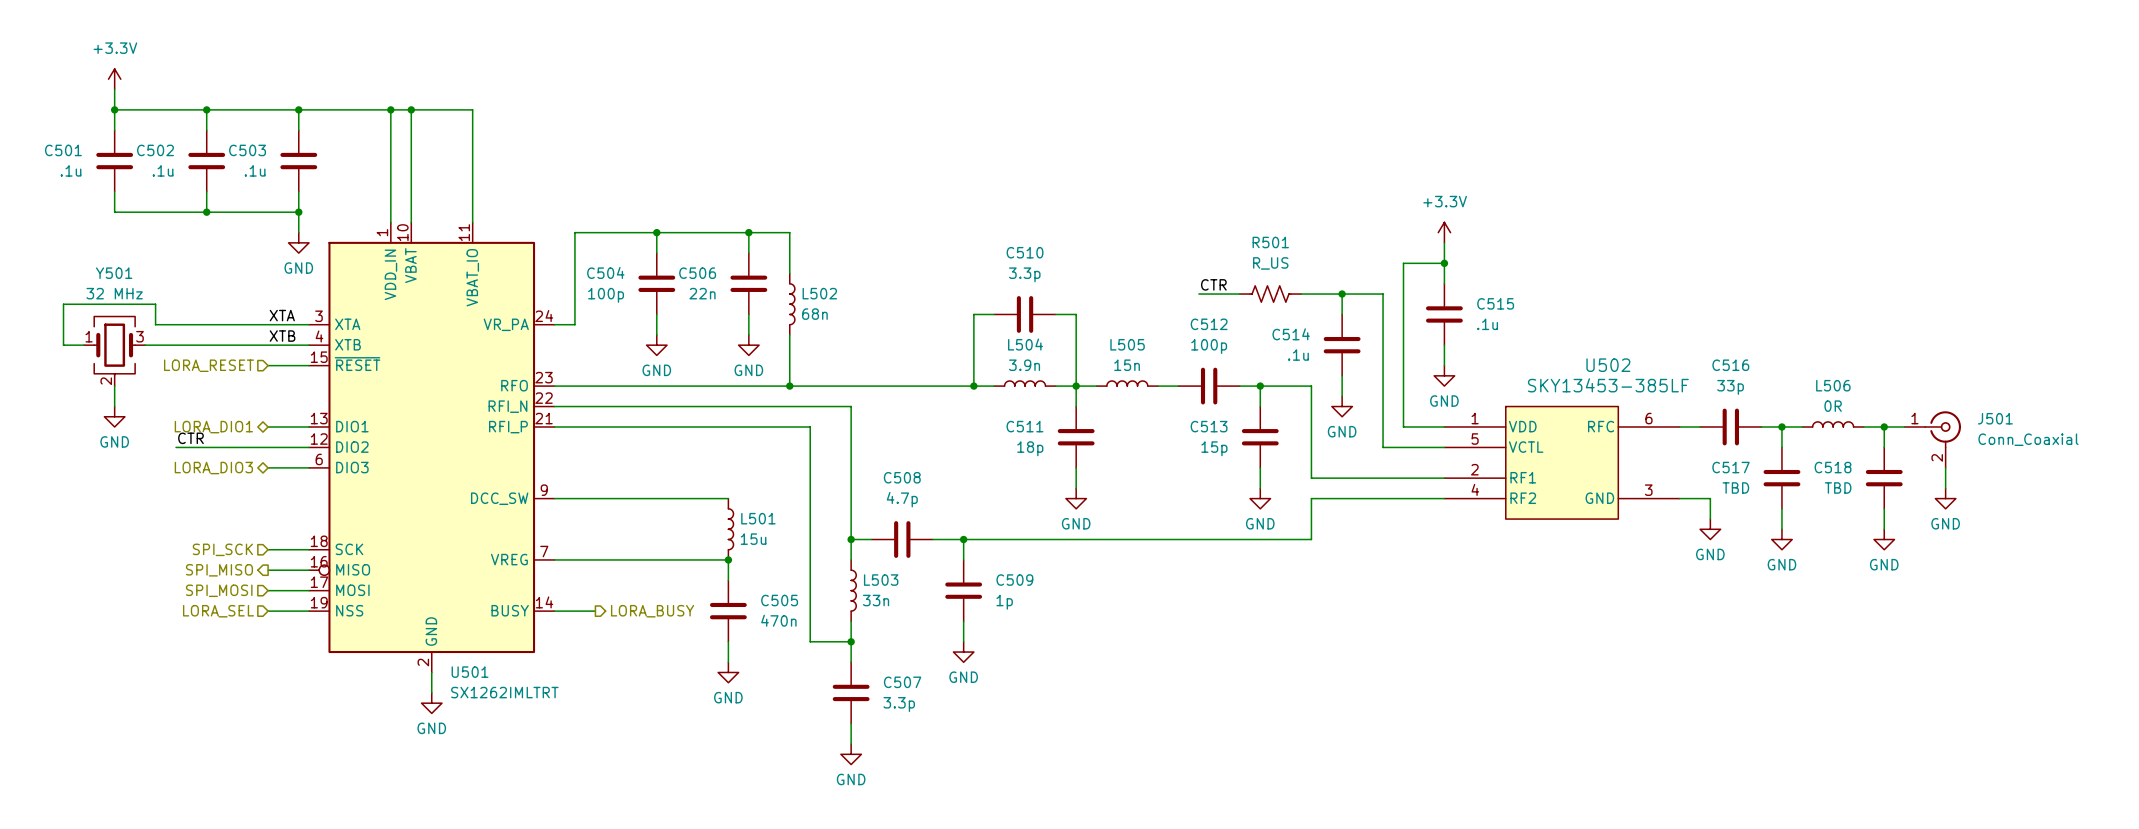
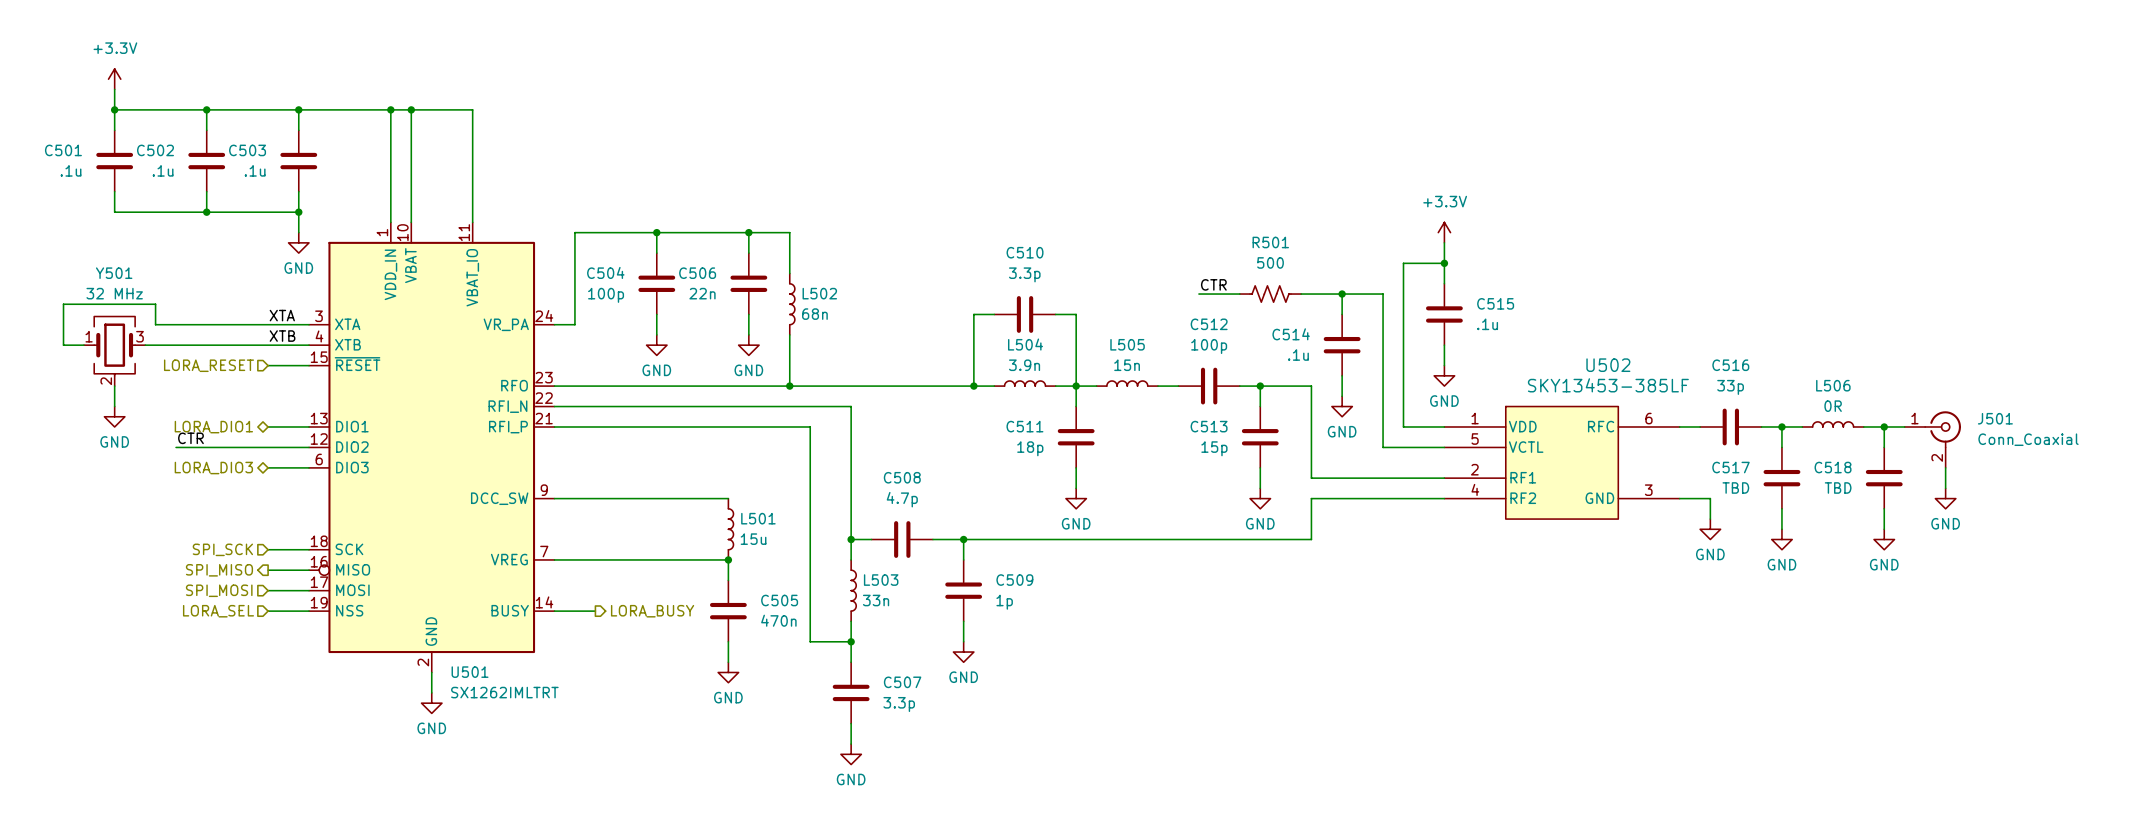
R501 value: R_US (1270, 263) -> 500 (1270, 262)

